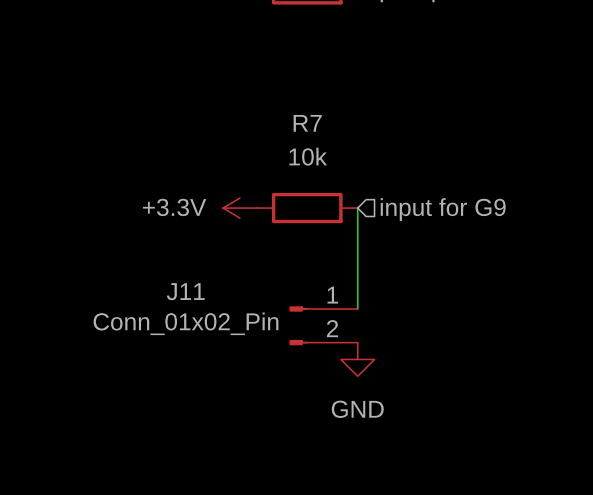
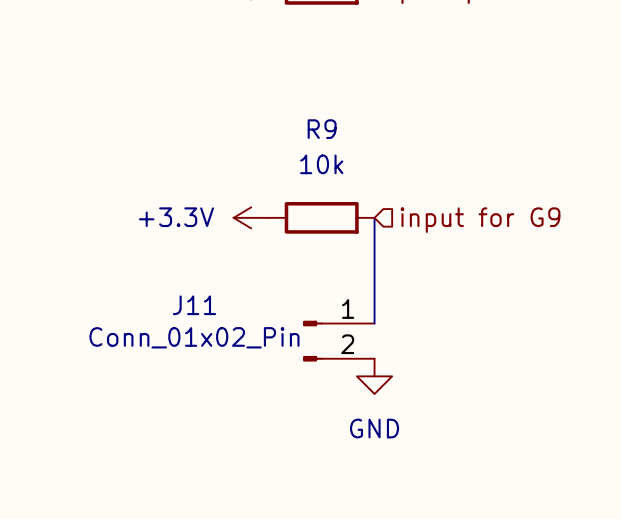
R7 name: R7 (307, 123) -> R9 (322, 129)

